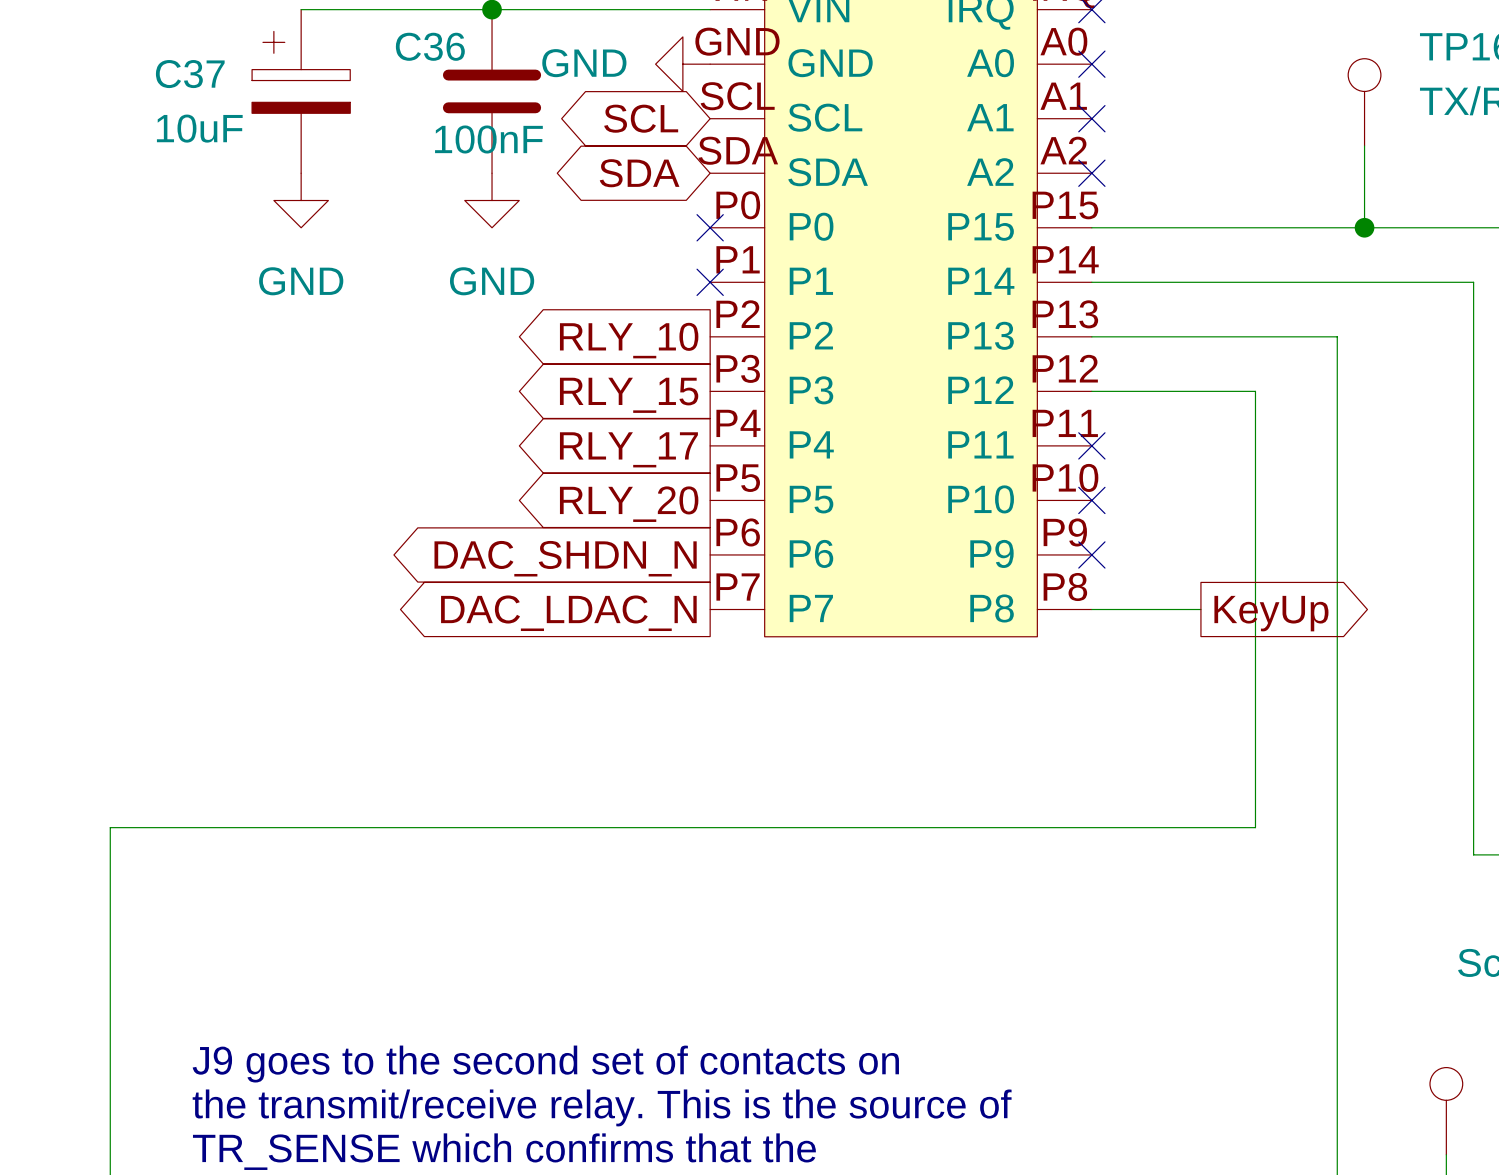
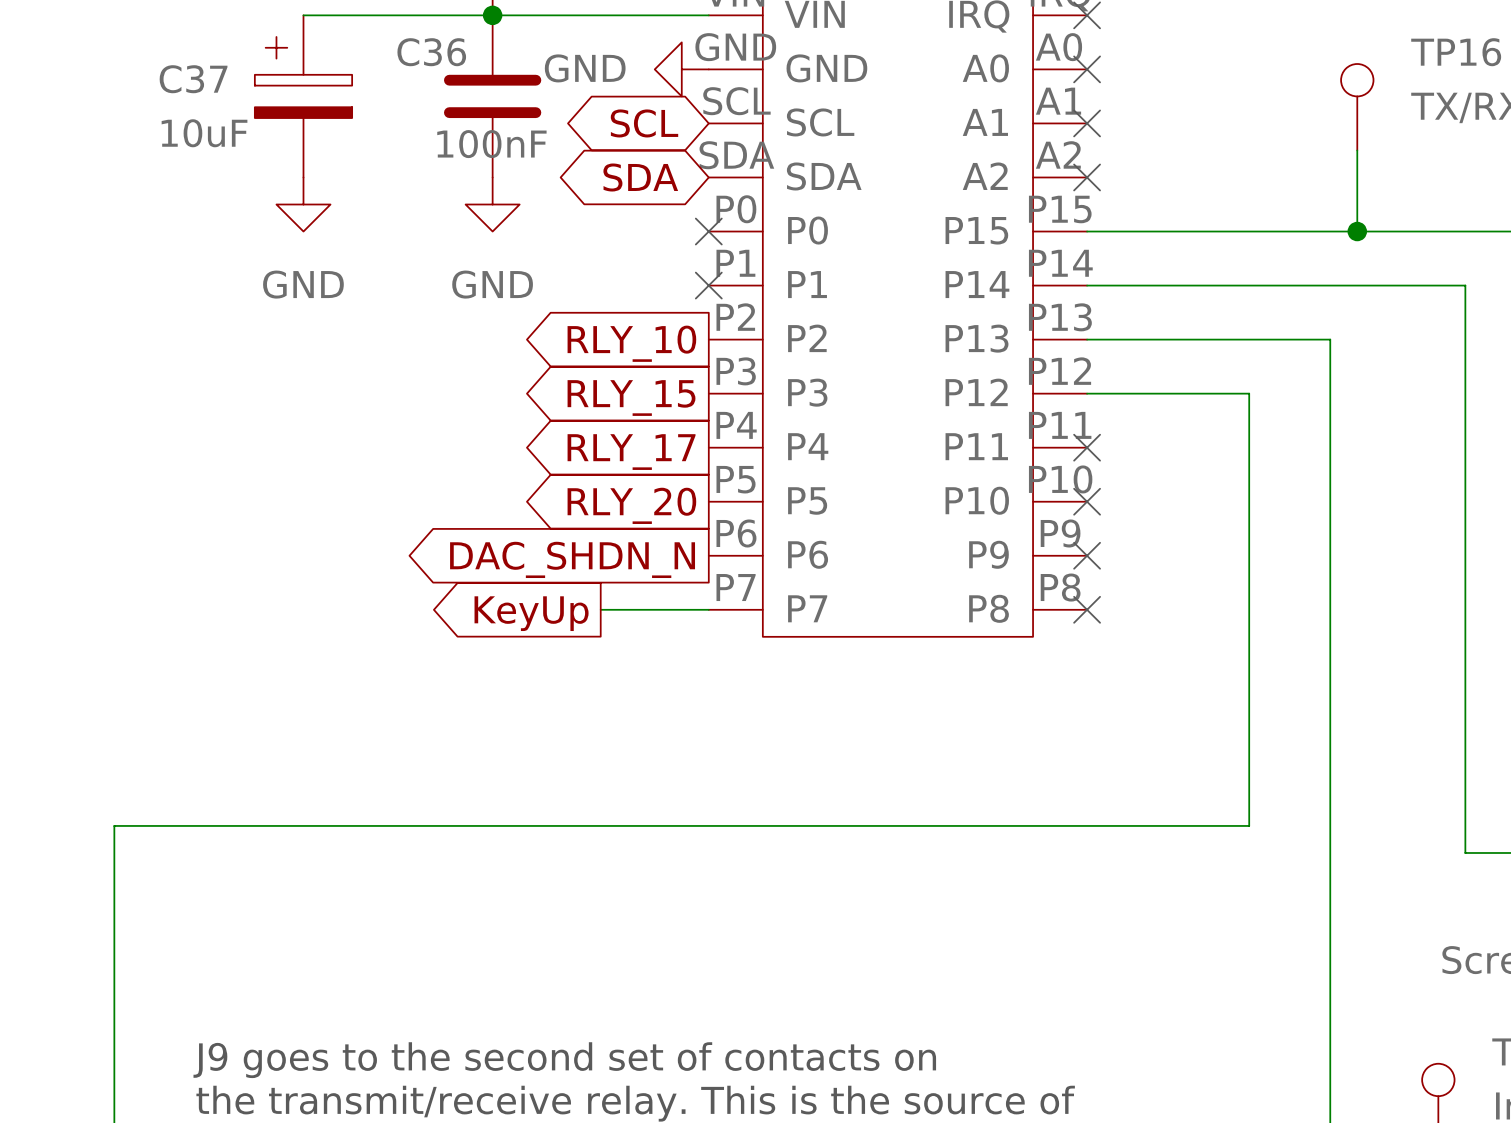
wire: (1091, 609) (1200, 609) -> (600, 609) (708, 609)
no-connect mark: none -> (1087, 609)
global label: none -> KeyUp (531, 613)
global label: DAC_LDAC_N (568, 613) -> none
global label: KeyUp (1271, 613) -> none

